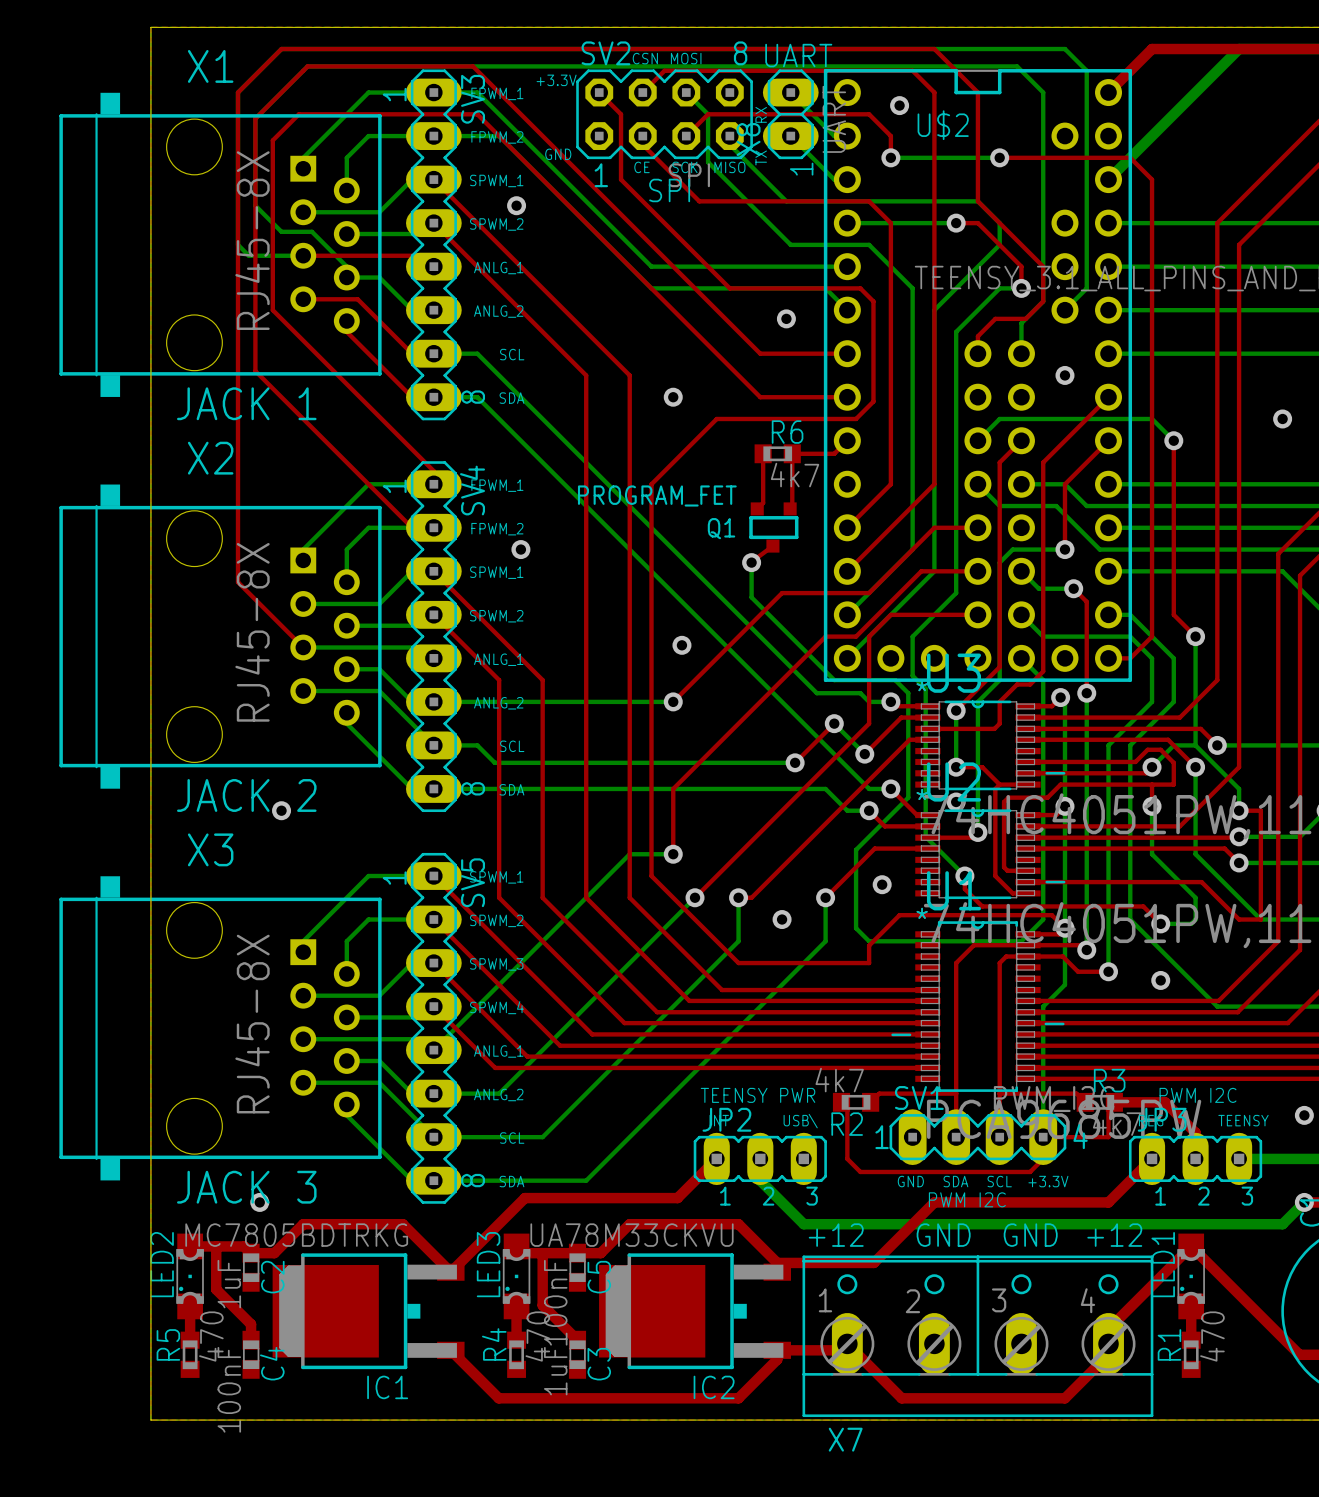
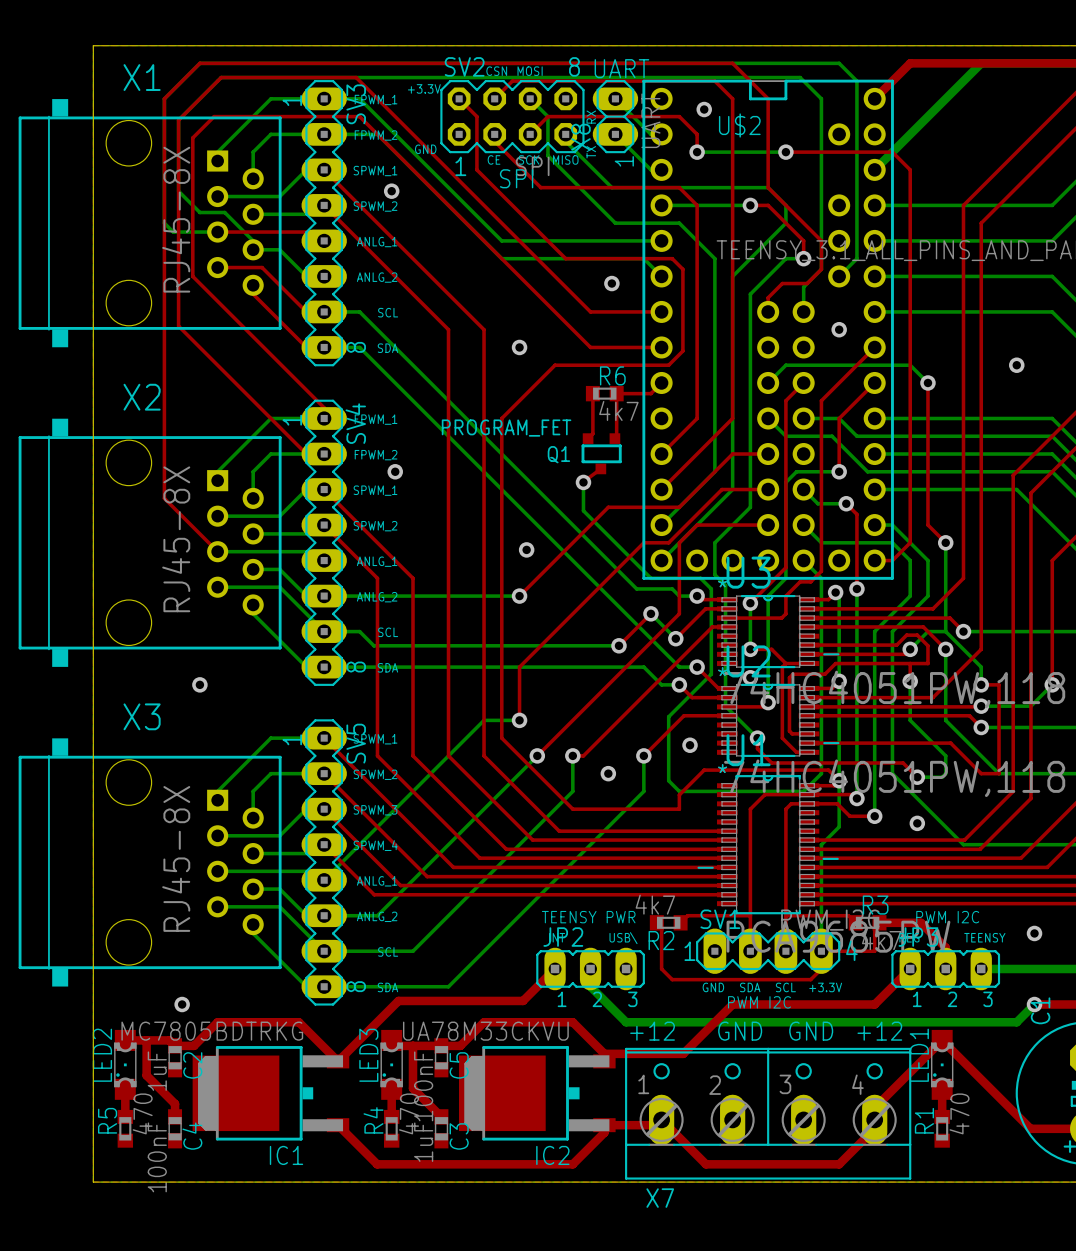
text: JACK 1 (246, 403) -> none
text: JACK 2 (246, 795) -> none
text: JACK 3 (246, 1187) -> none

